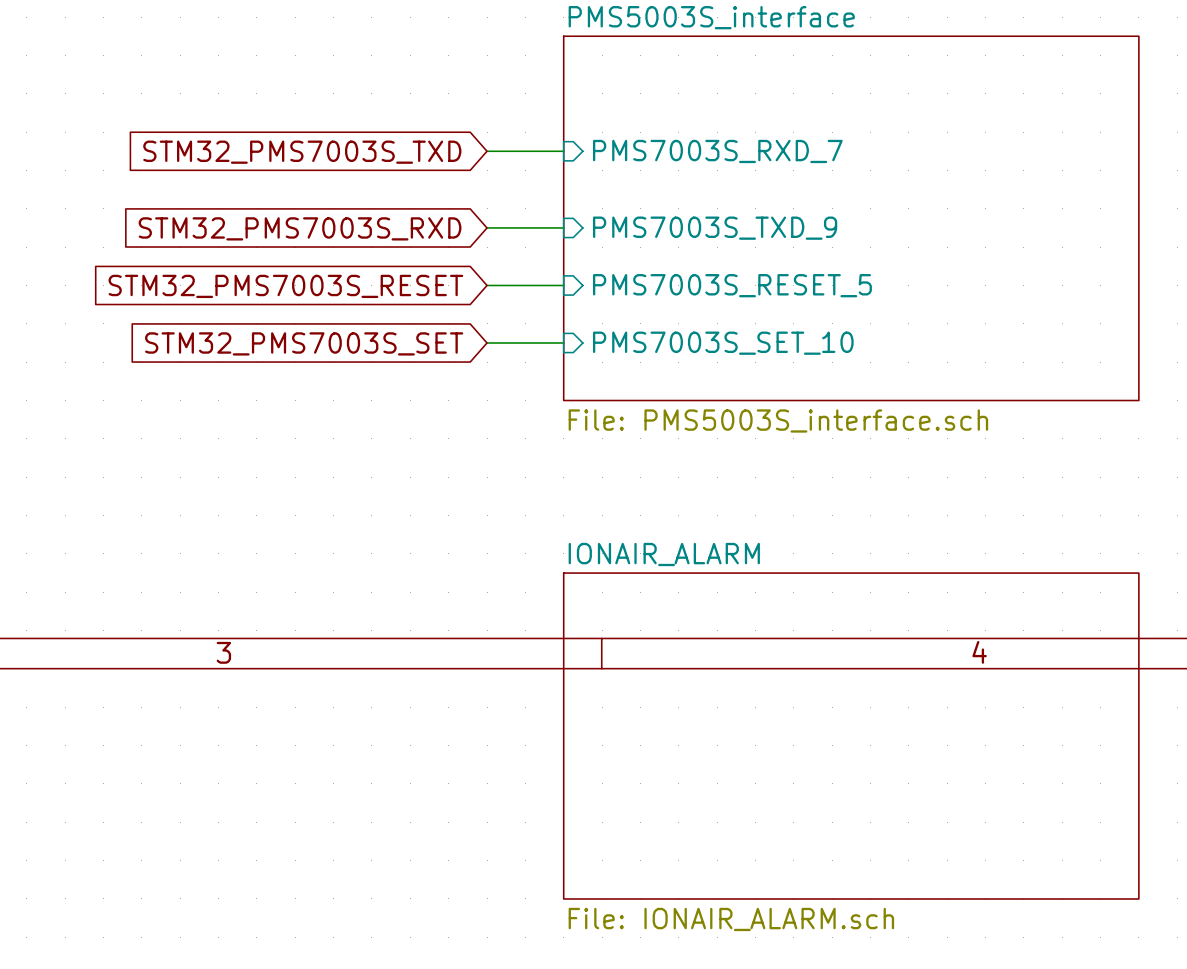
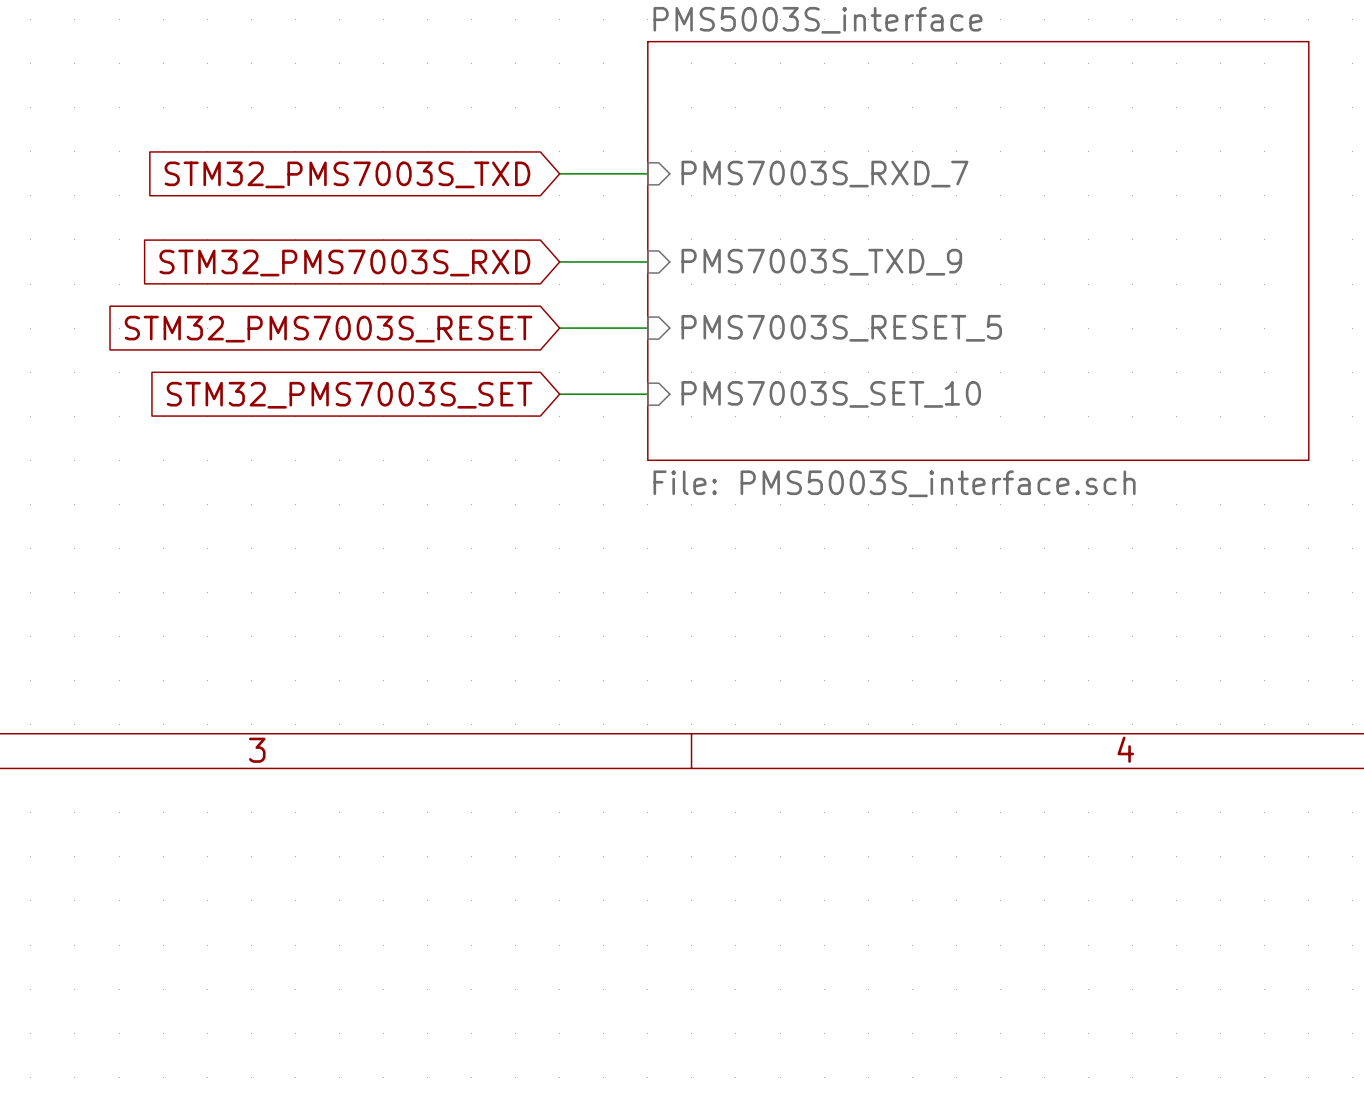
sheet IONAIR_ALARM: File: IONAIR_ALARM.sch (851, 736) -> none

